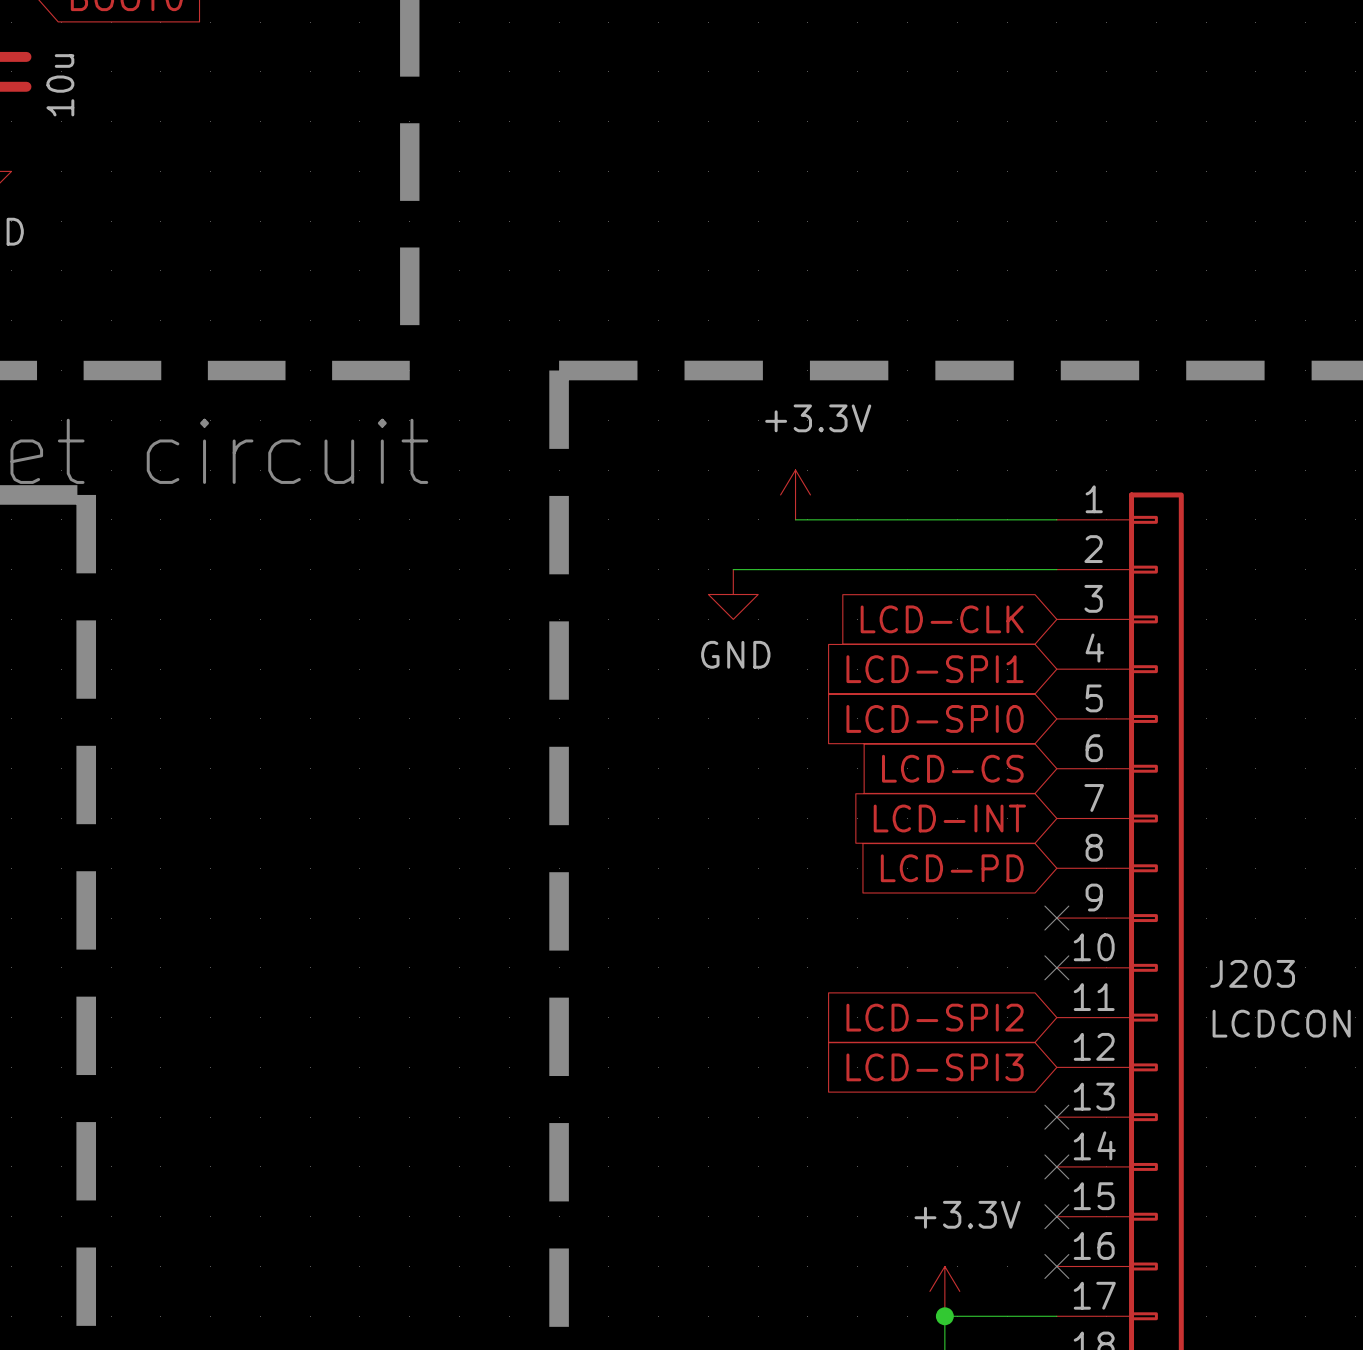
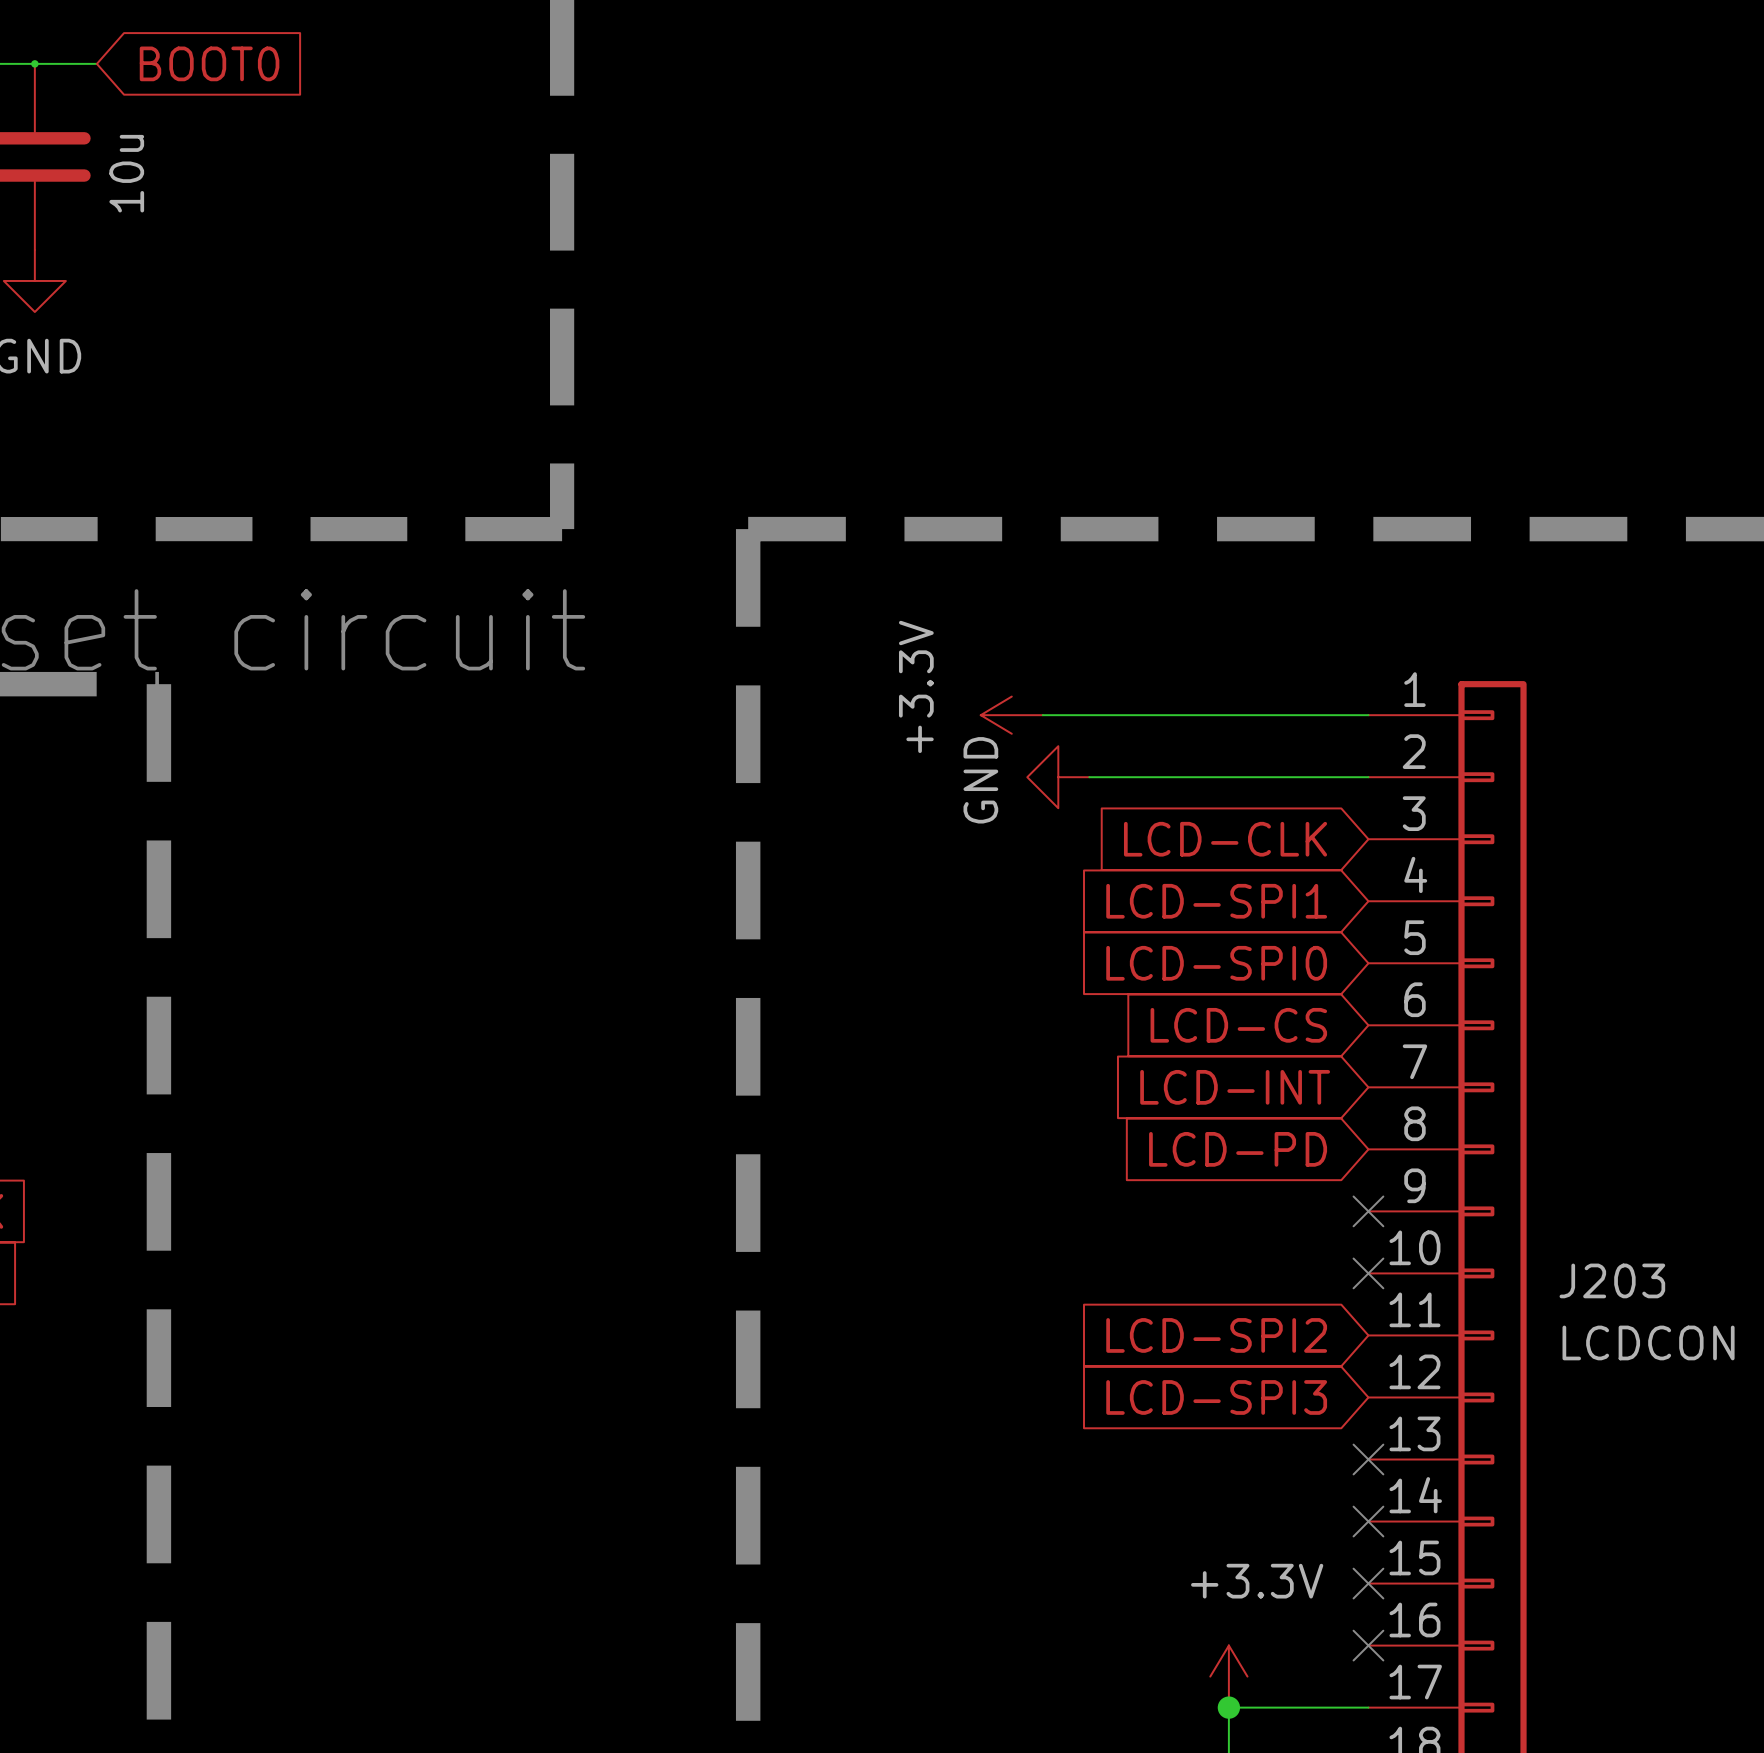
power symbol rotation: 0° (795, 494) -> 90° counterclockwise (1011, 715)
power symbol position: +3.3V (795, 494) -> +3.3V (1011, 715)
wire: (733, 569) (832, 569) -> none
power symbol rotation: 0° (733, 594) -> 90° clockwise (1058, 777)
power symbol position: GND (733, 594) -> GND (1058, 777)

